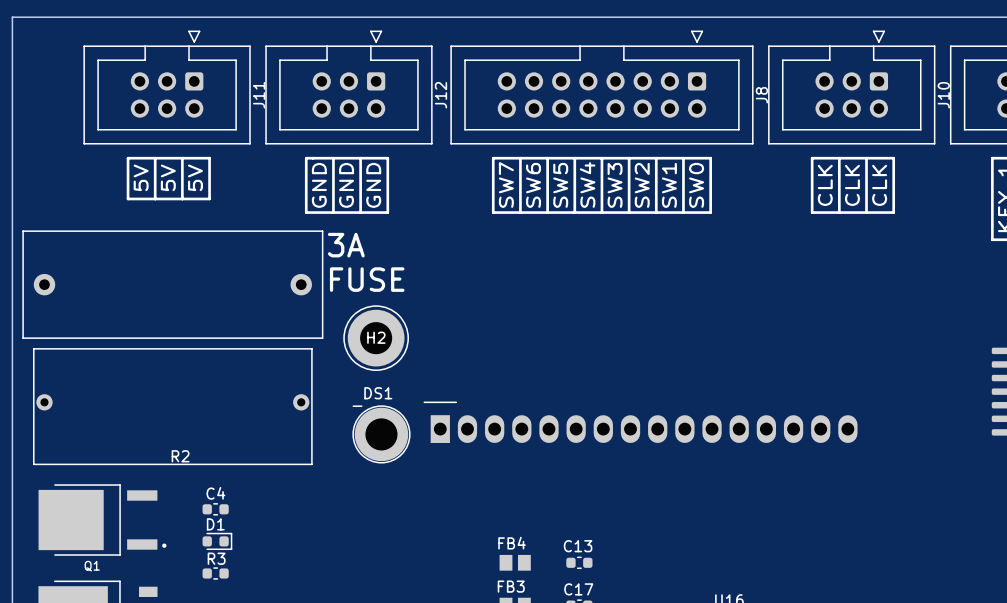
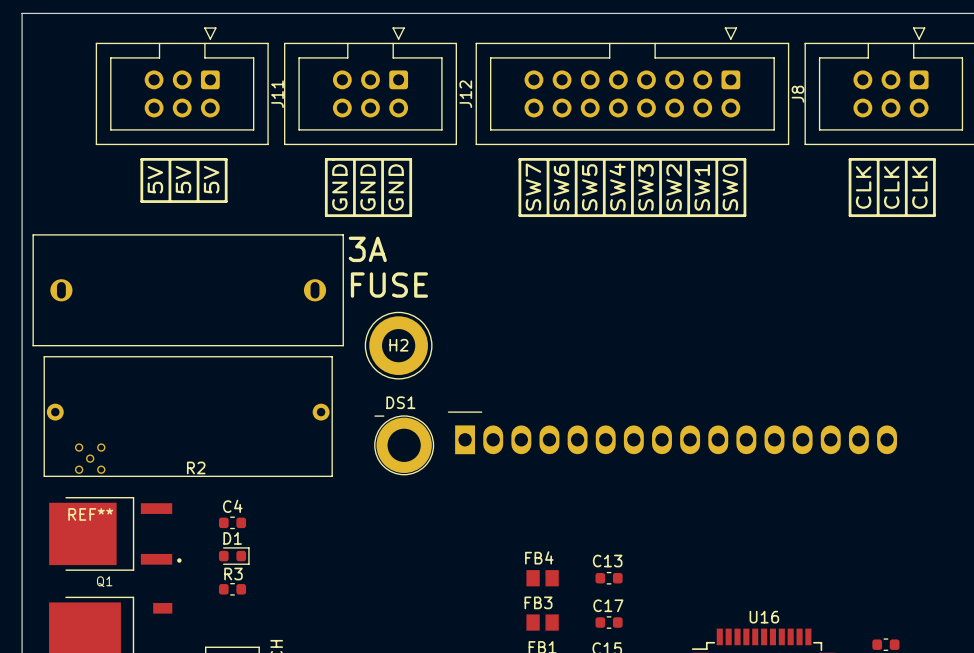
part footprint: [22, 230, 324, 339] -> [32, 234, 344, 347]
REF**: none -> (90, 458)

